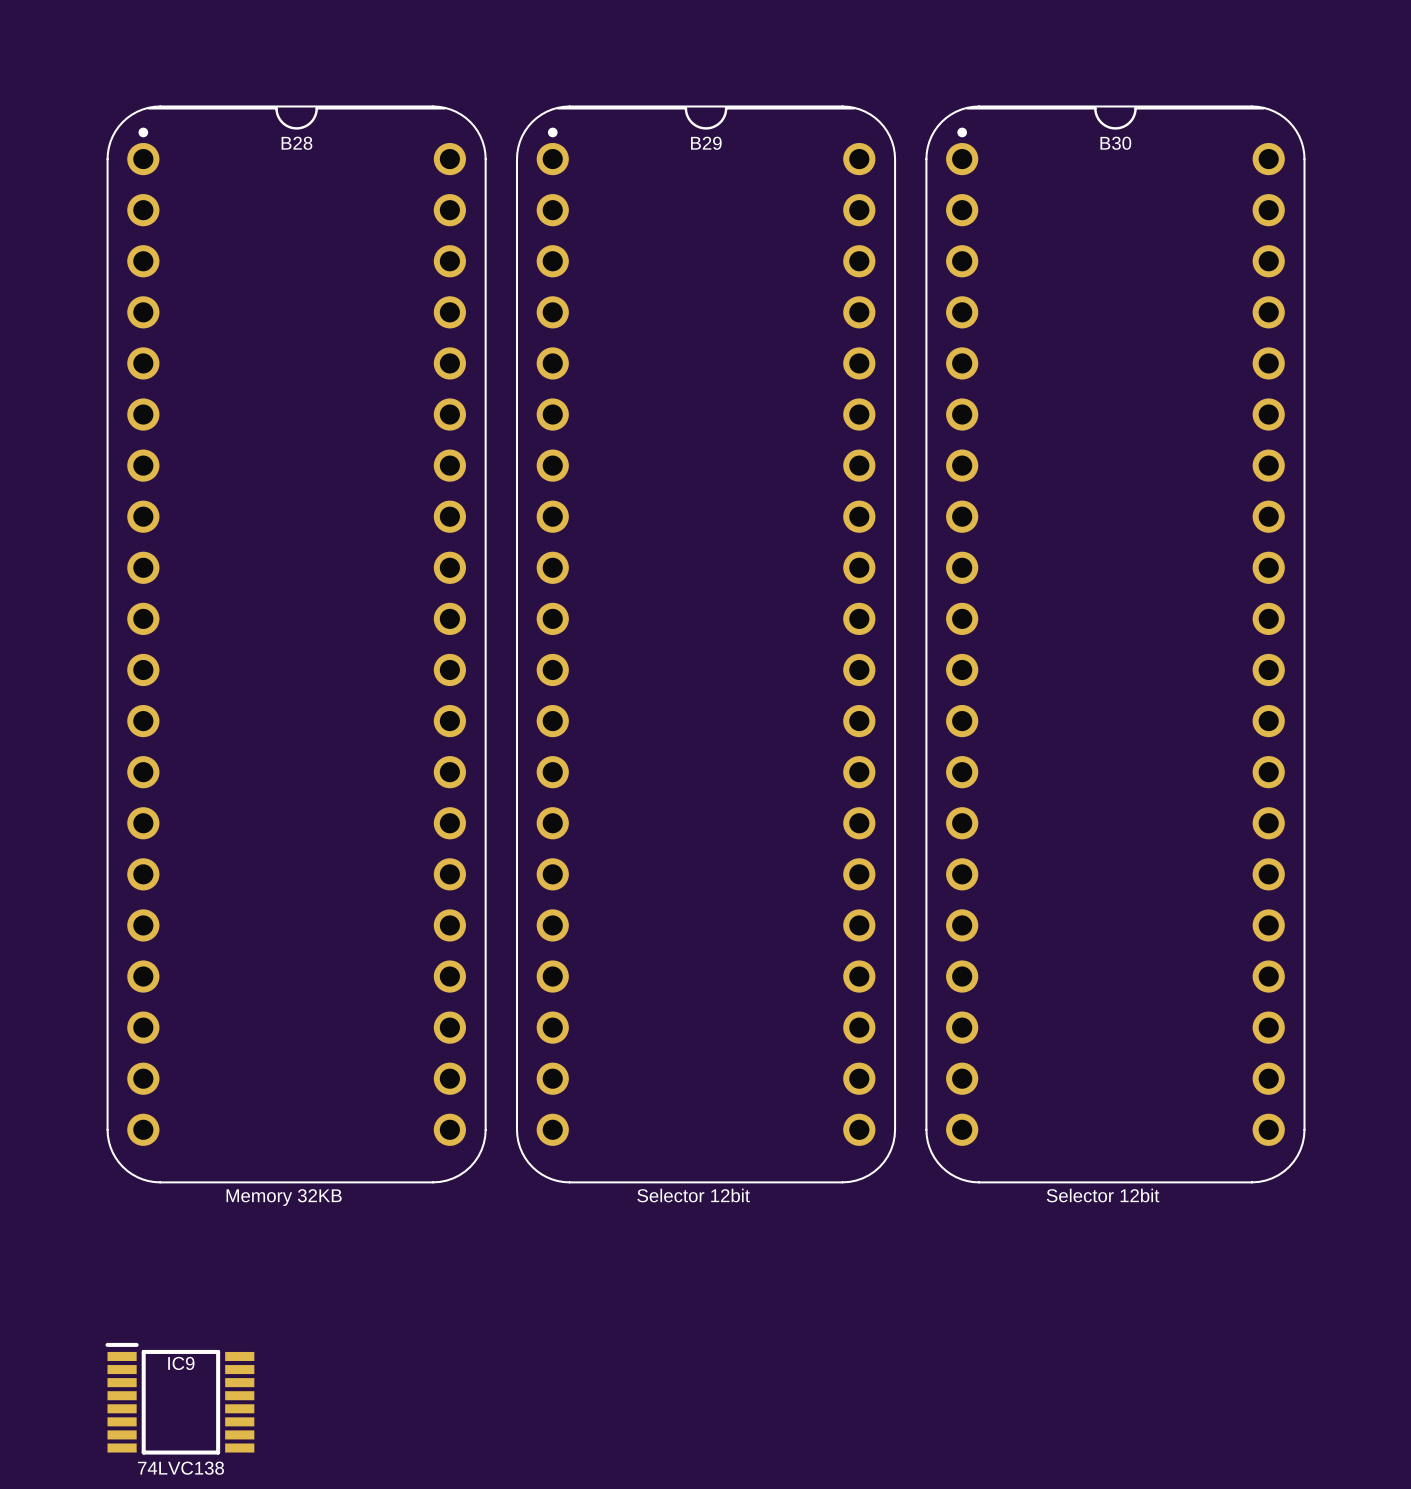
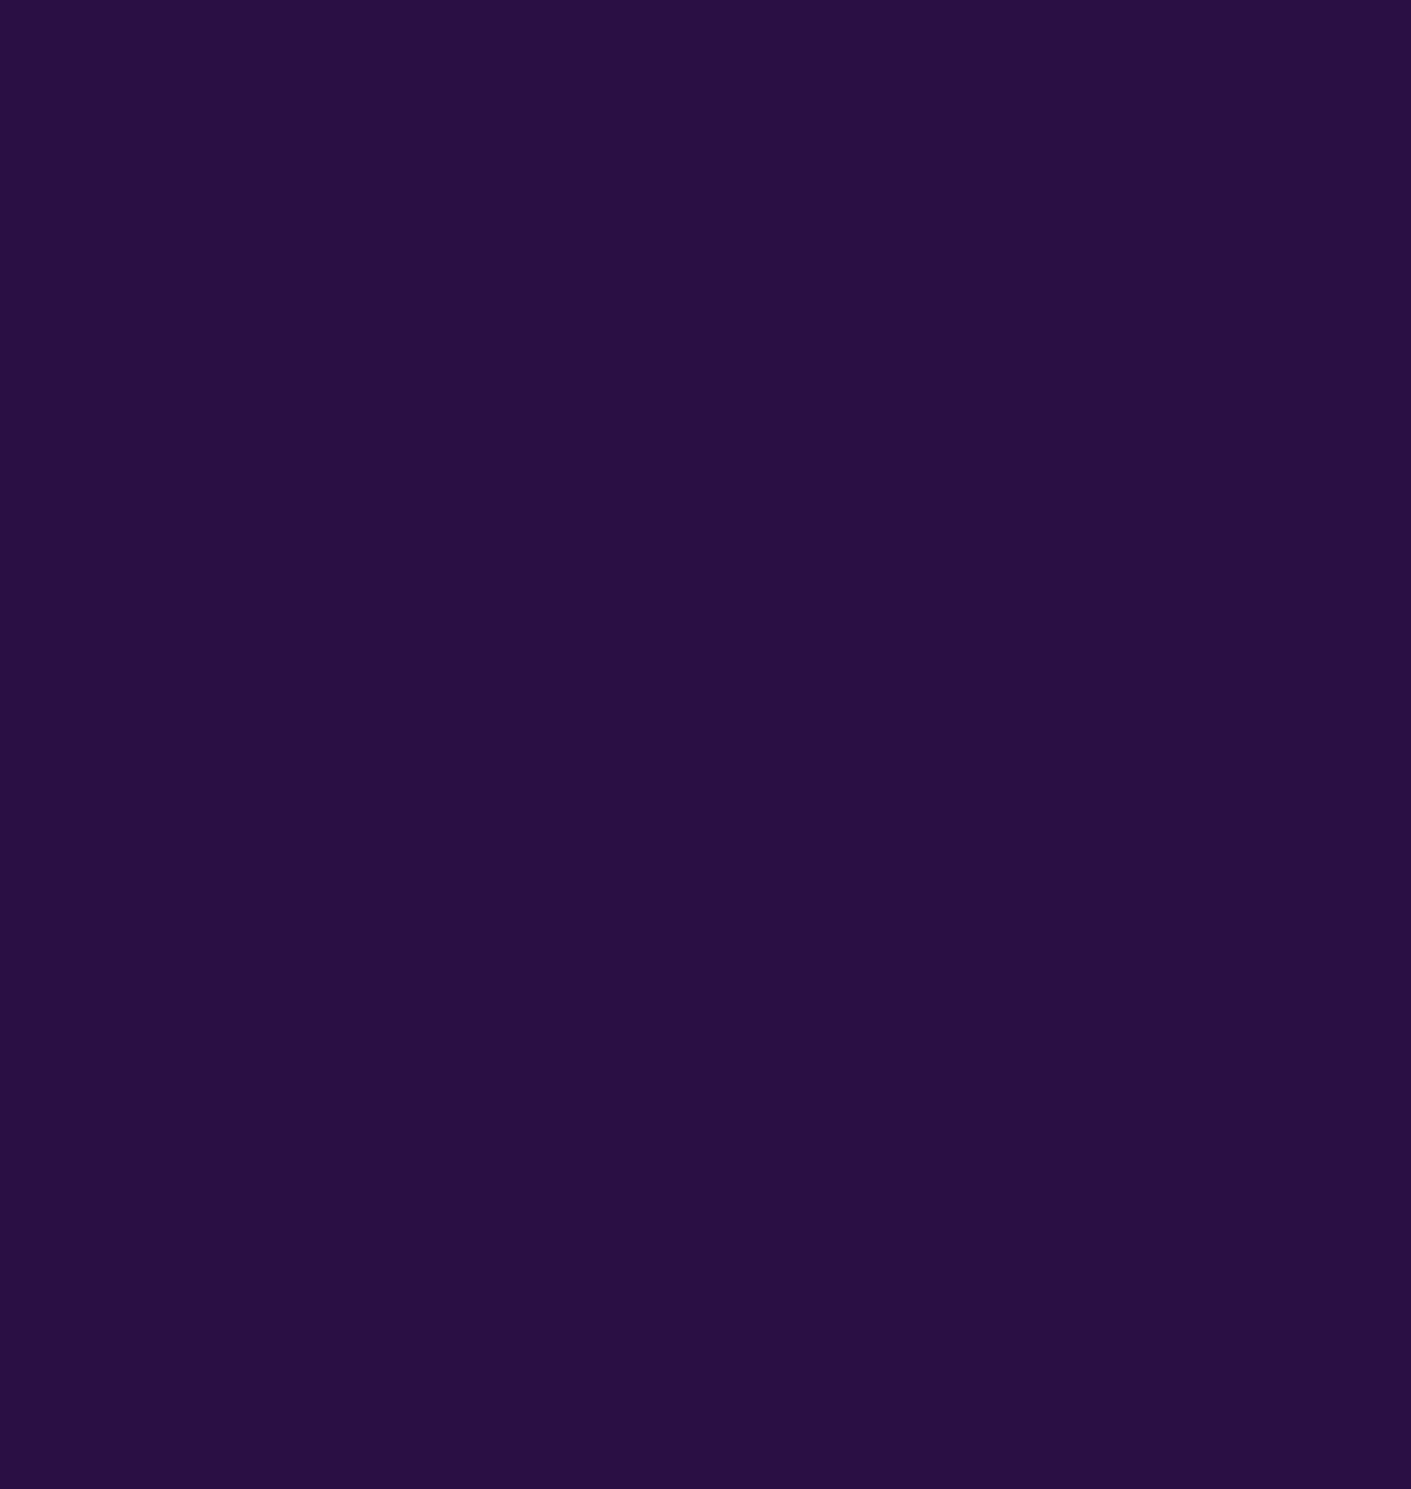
B28: (296, 644) -> none
B29: (706, 644) -> none
B30: (1115, 644) -> none
IC9: (179, 1398) -> none

